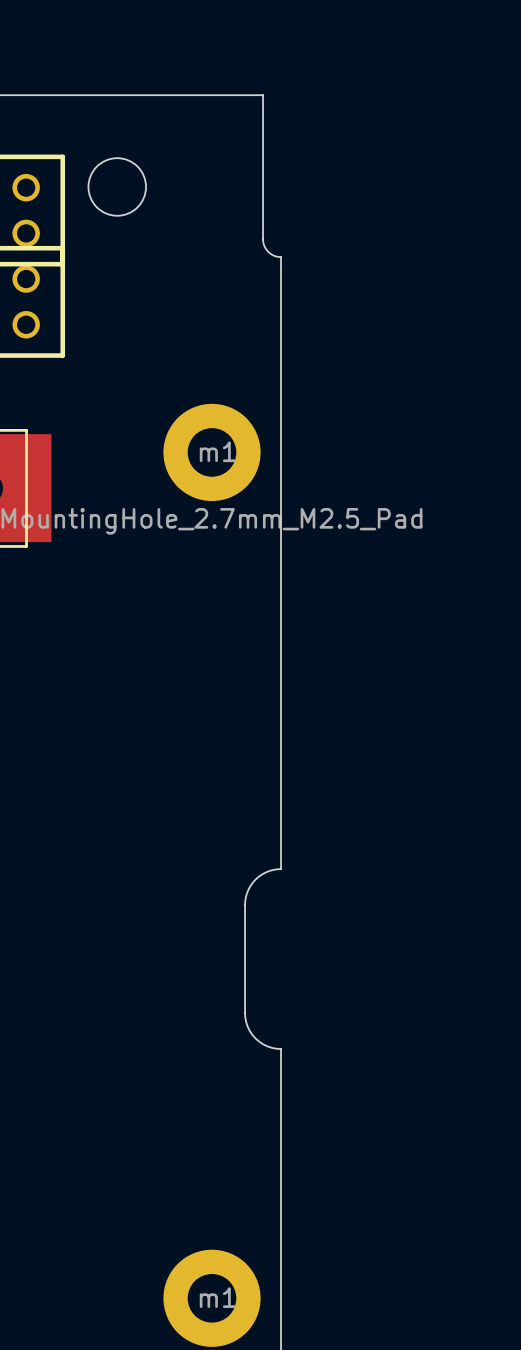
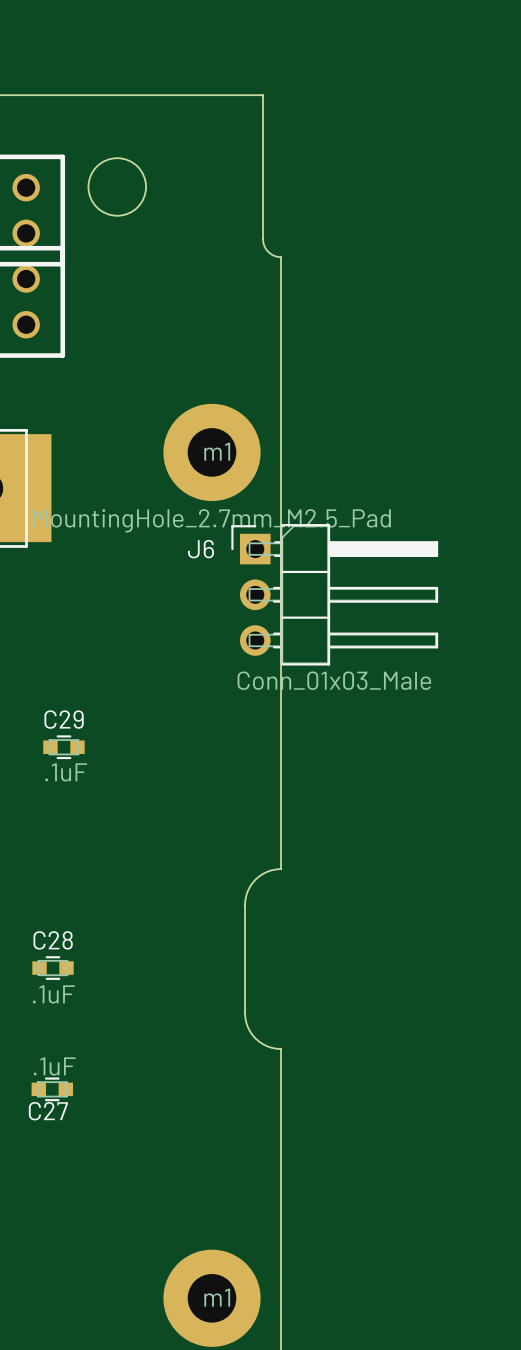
J6: none -> Conn_01x03_Male (334, 594)
C29: none -> .1uF (63, 747)
C28: none -> .1uF (53, 968)
C27: none -> .1uF (52, 1089)

